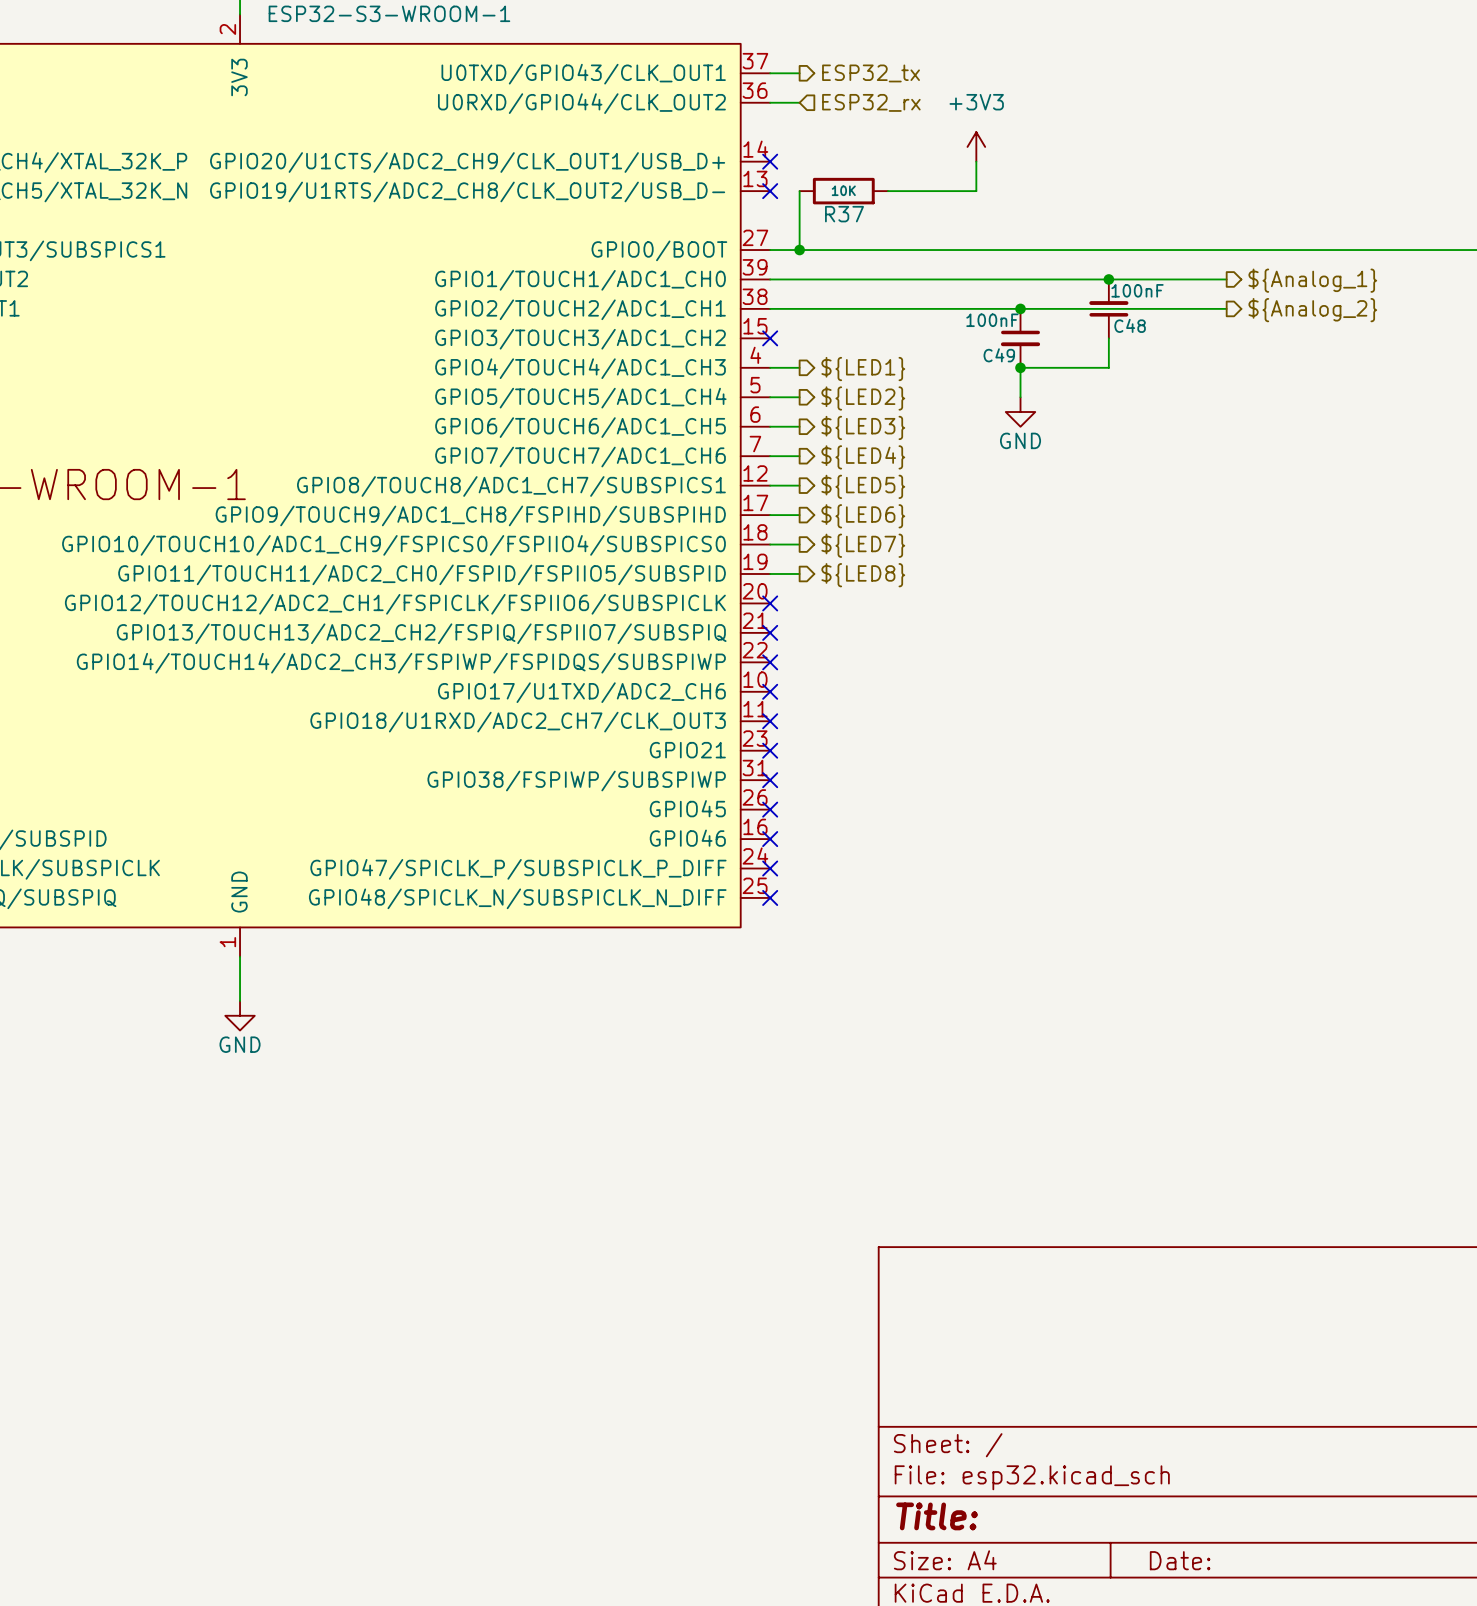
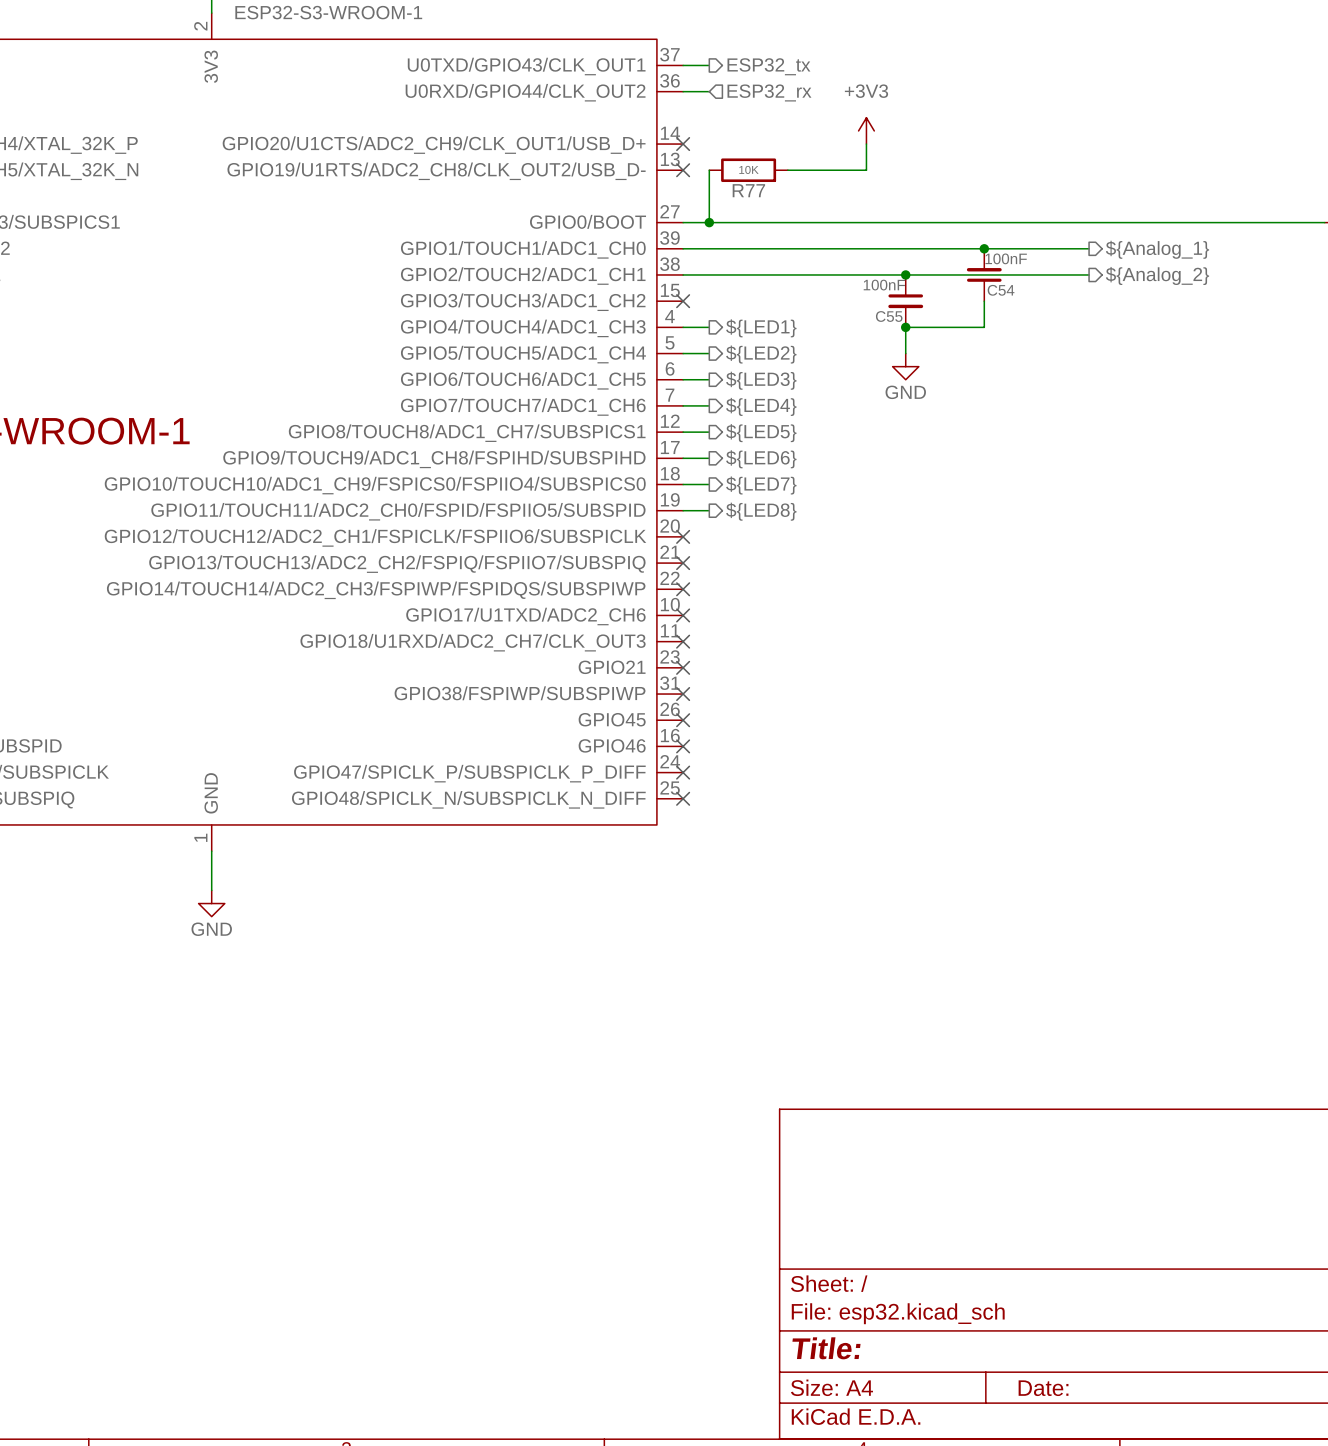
R37 name: R37 (844, 214) -> R77 (748, 190)
C48 name: C48 (1130, 325) -> C54 (1001, 290)
C49 name: C49 (999, 355) -> C55 (889, 316)

